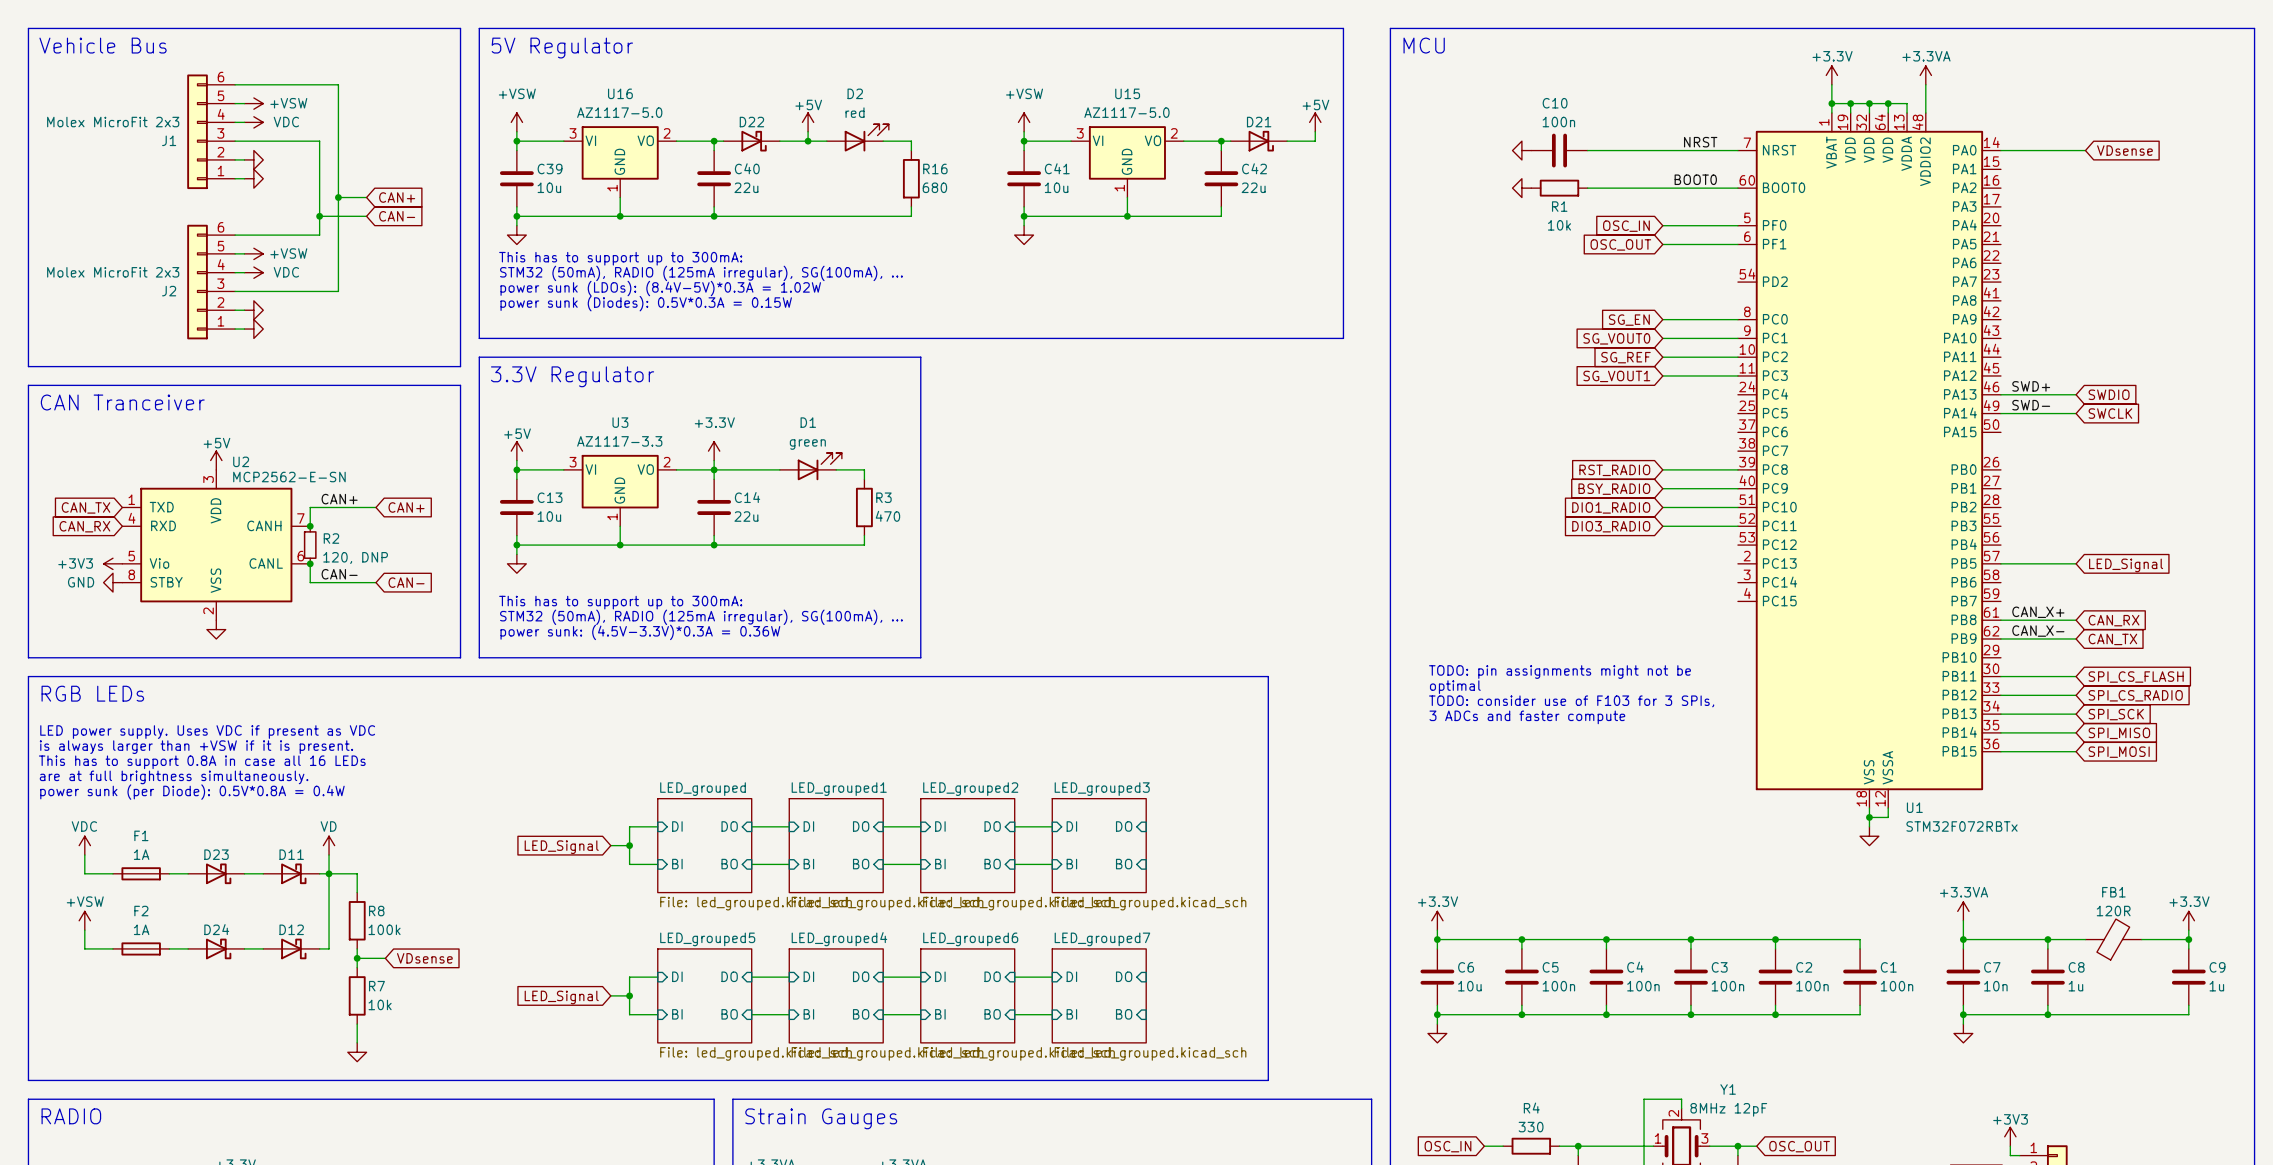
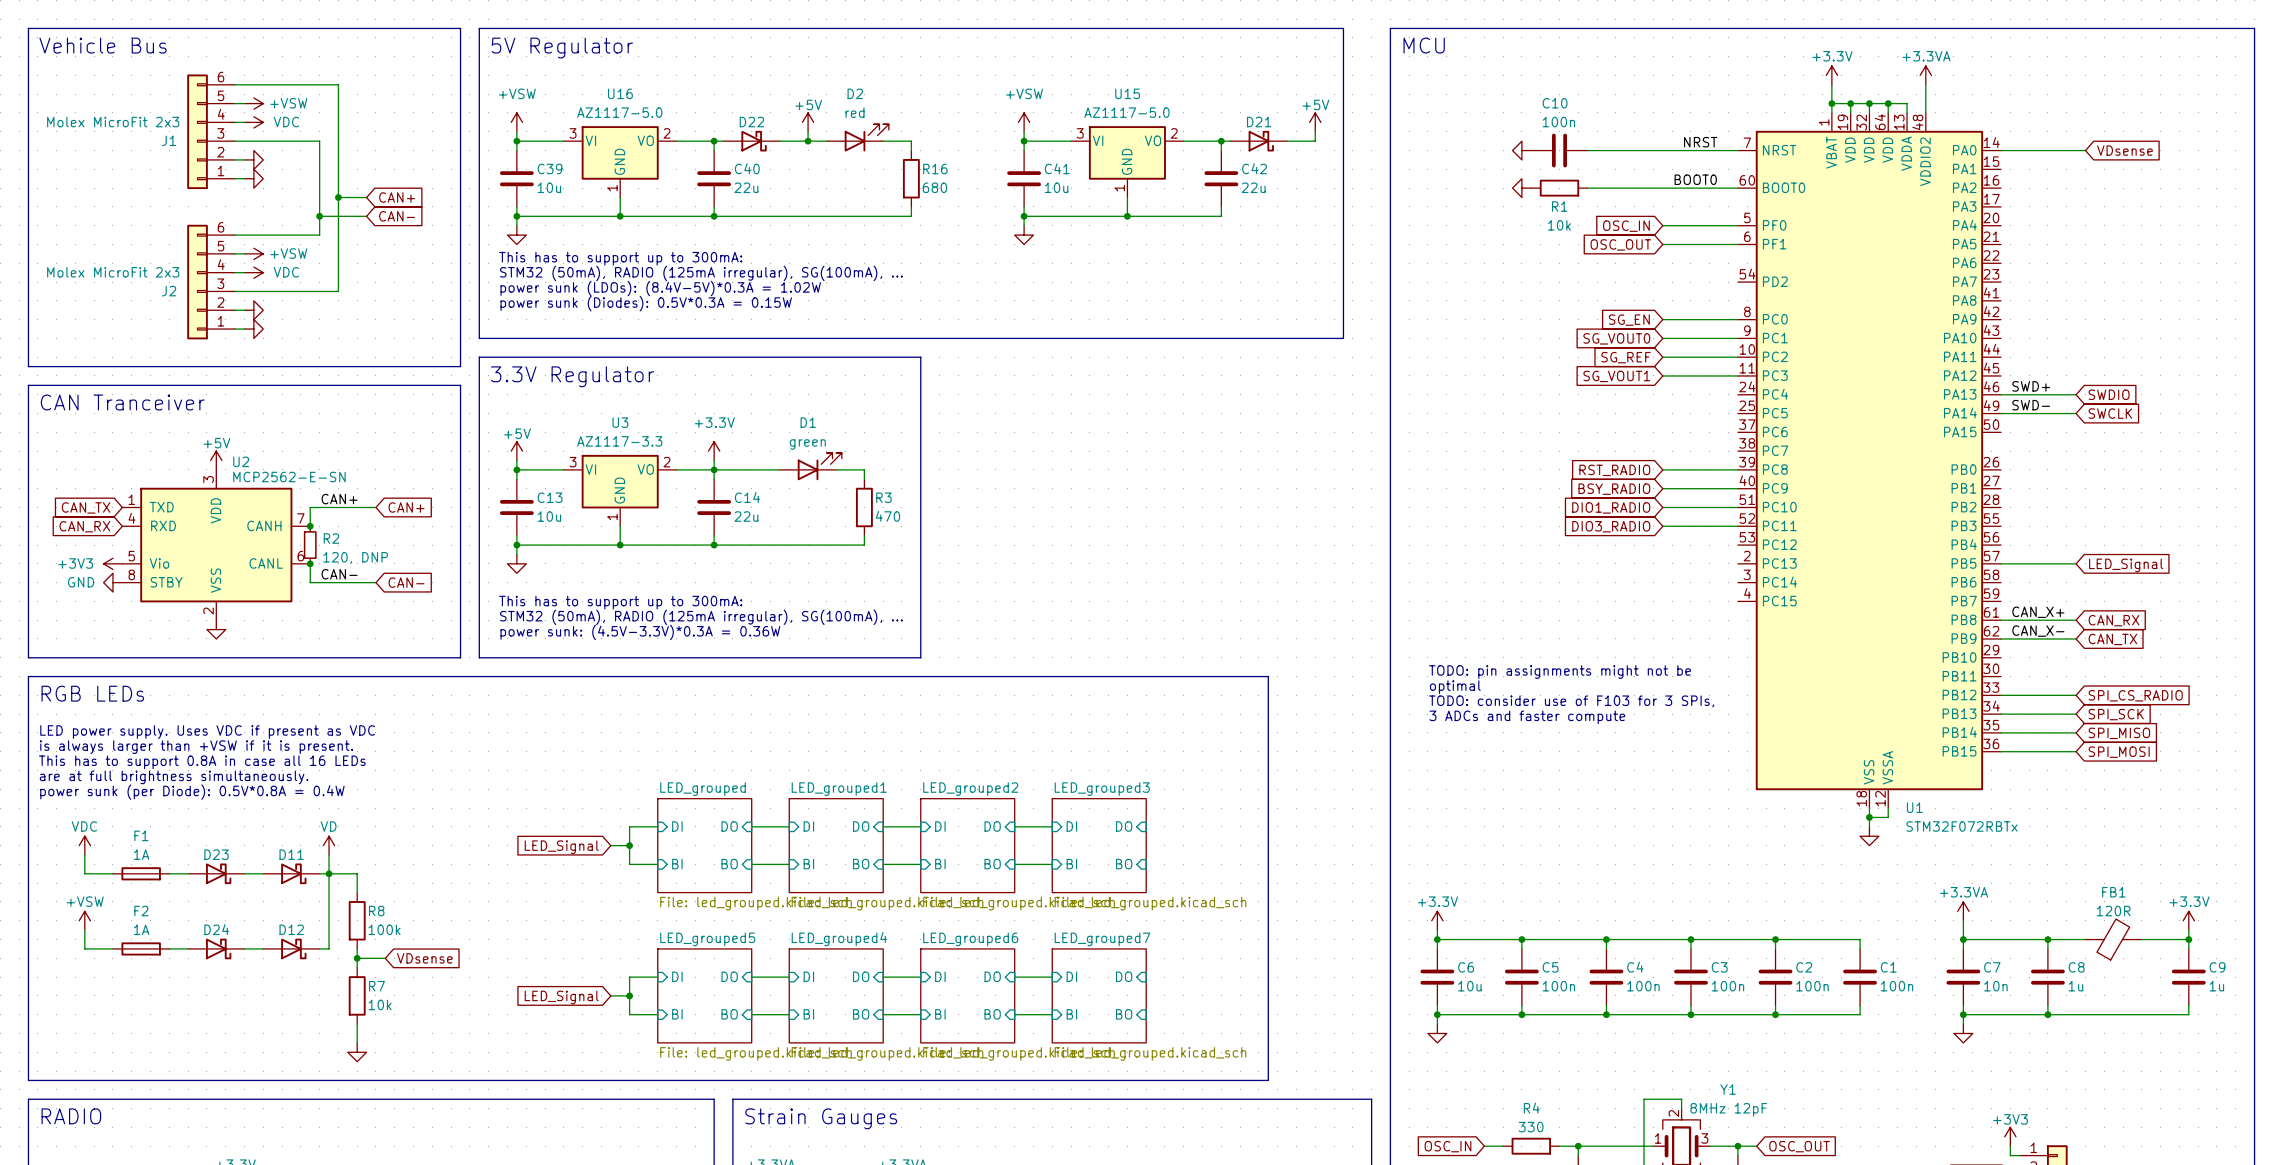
wire: (2000, 676) (2076, 676) -> none
global label: SPI_CS_FLASH (2136, 677) -> none

